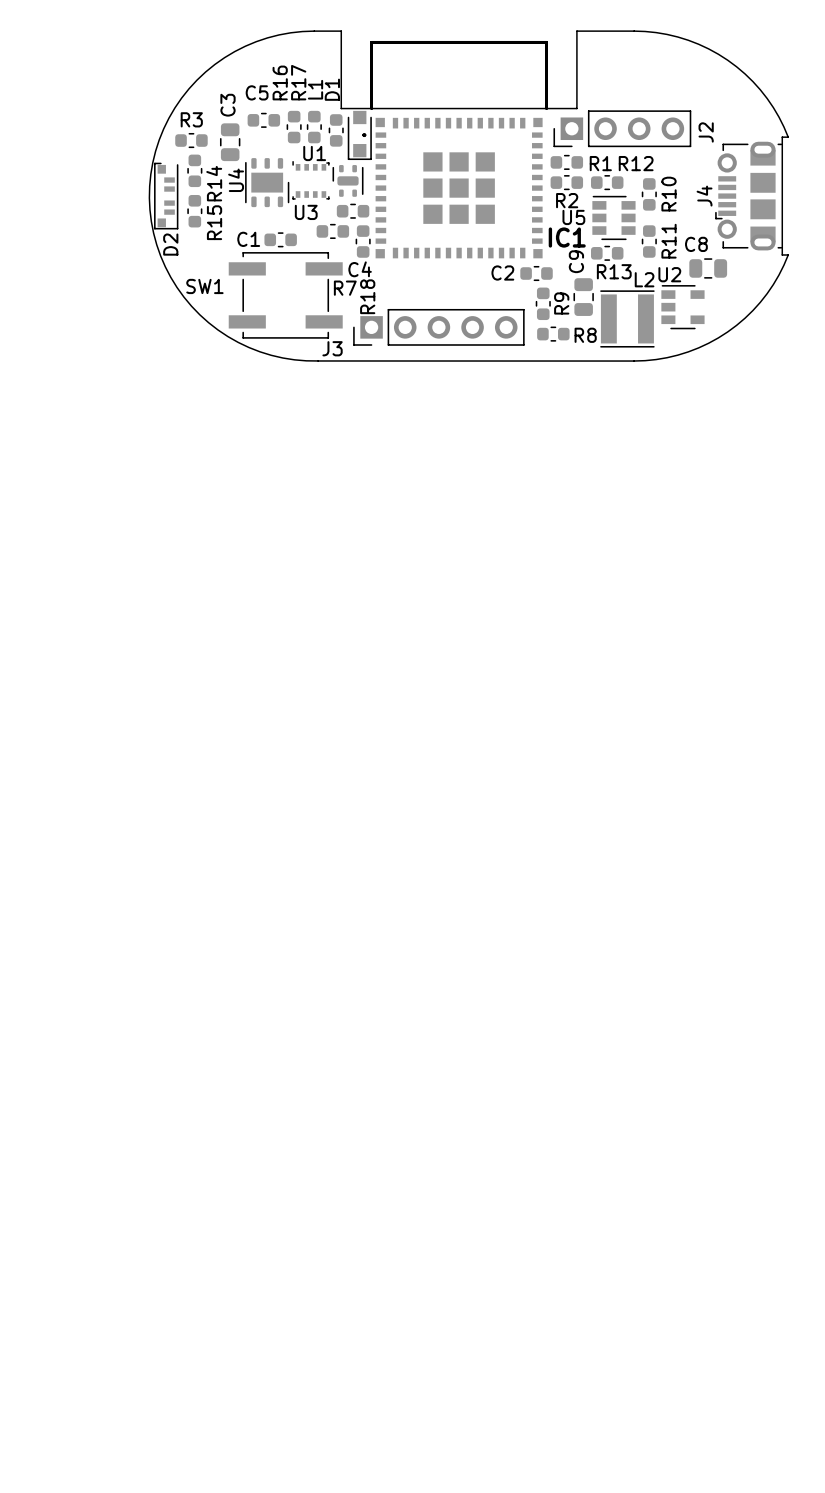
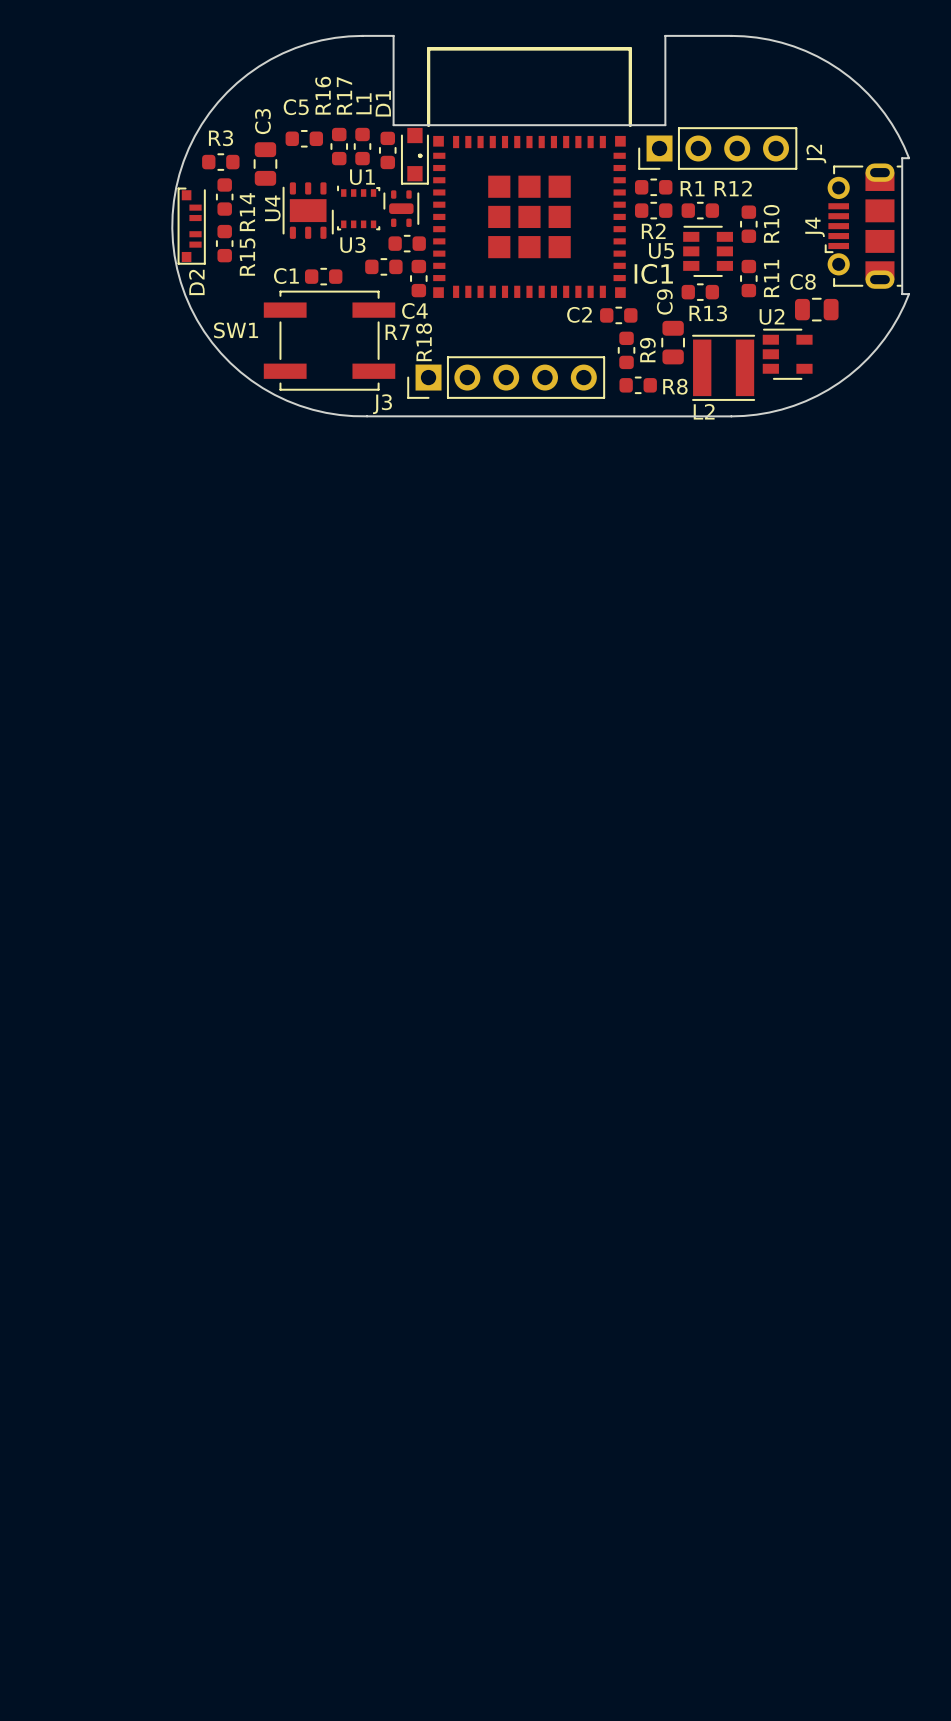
L2 name position: L2 (644, 279) -> L2 (704, 411)

